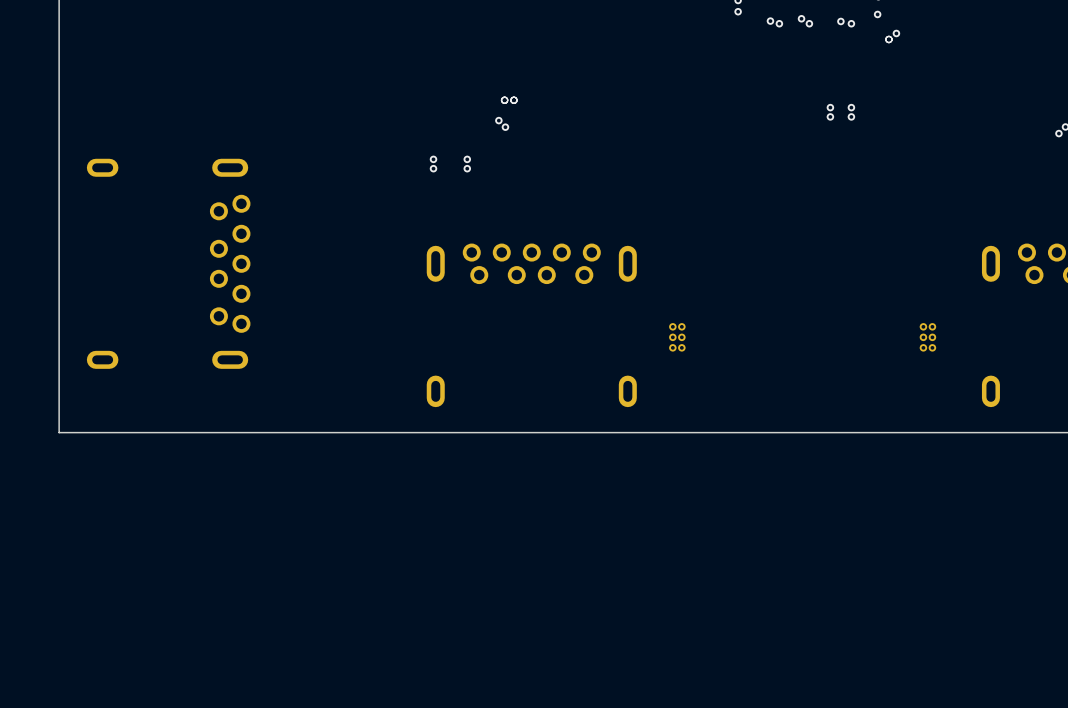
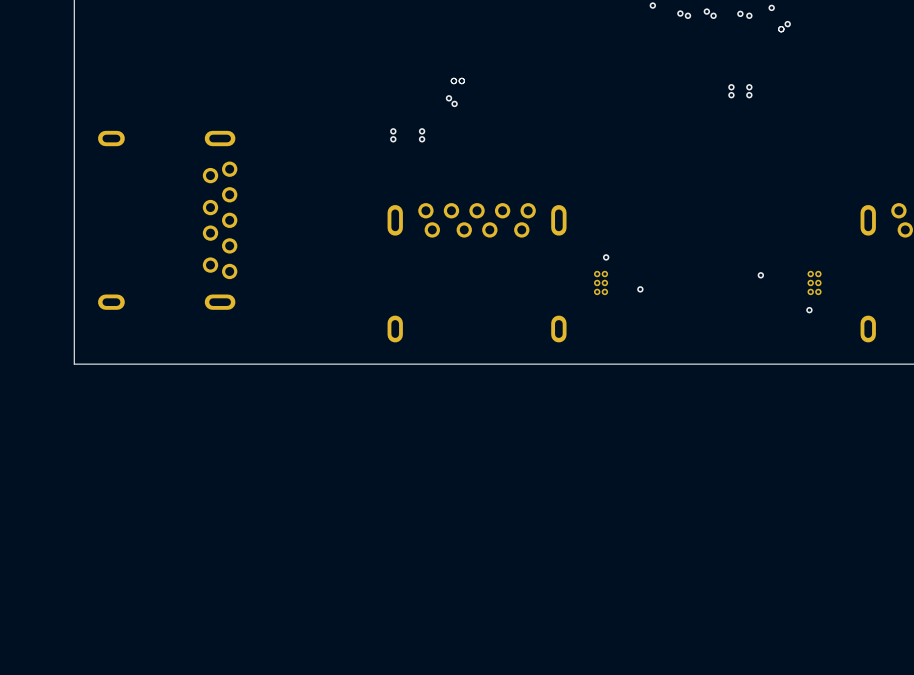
via: none -> (606, 257)
via: none -> (760, 275)
via: none -> (640, 289)
via: none -> (809, 310)

